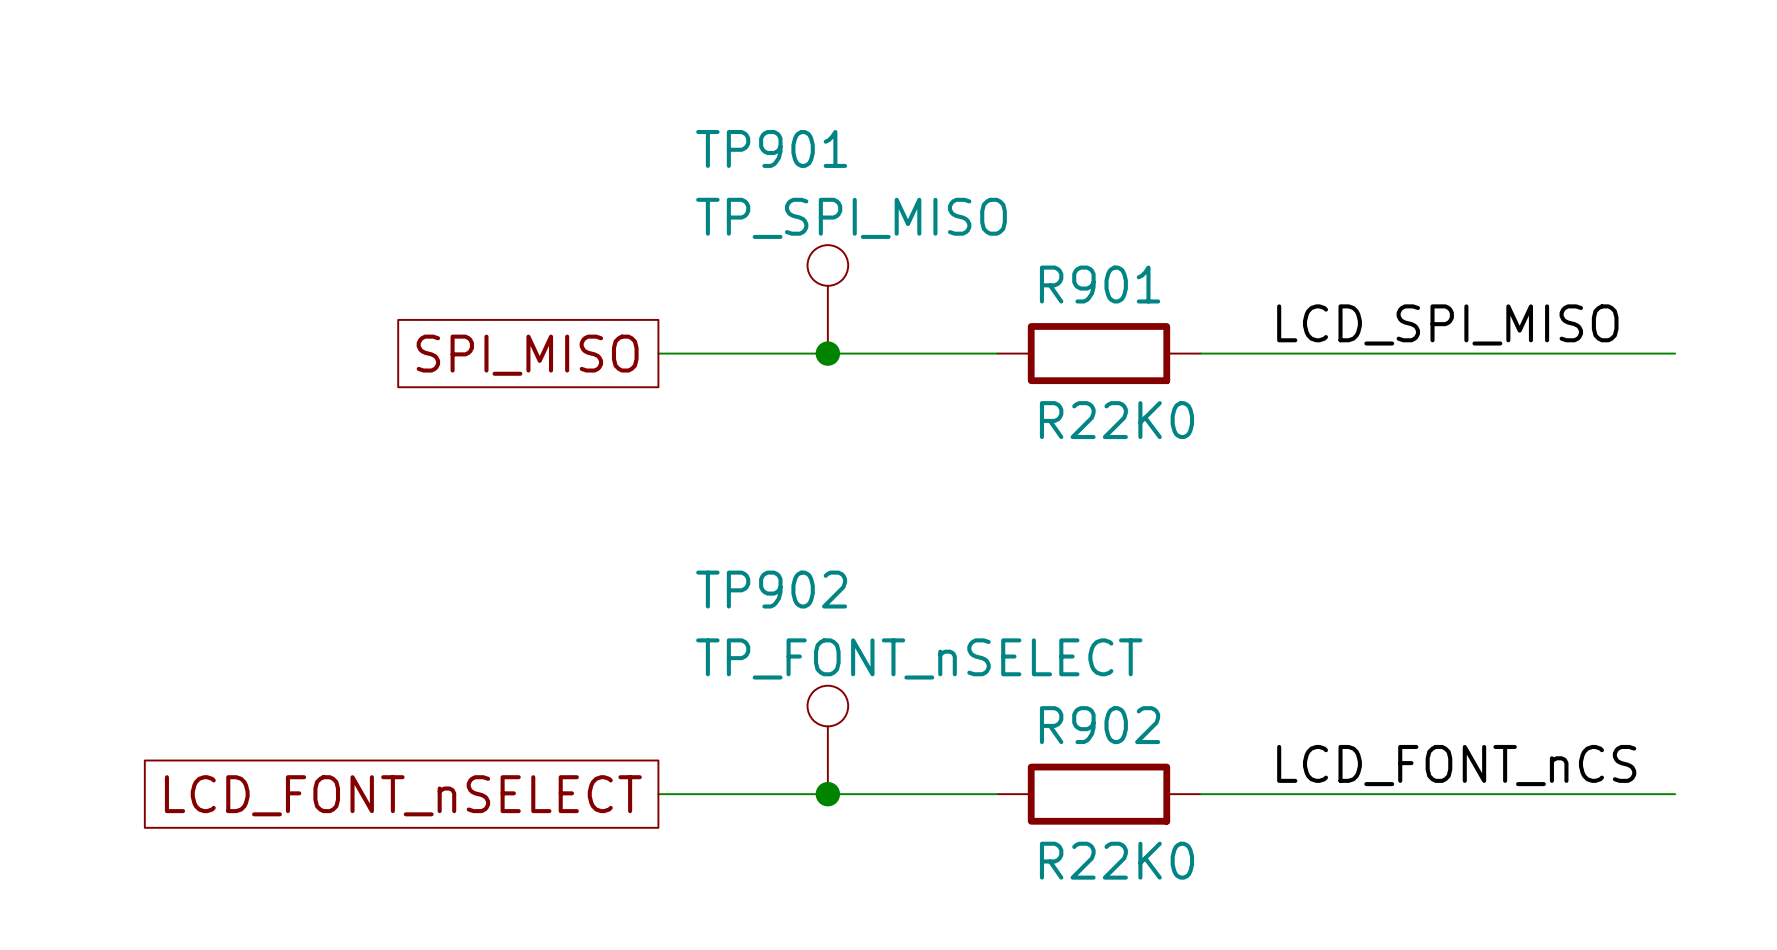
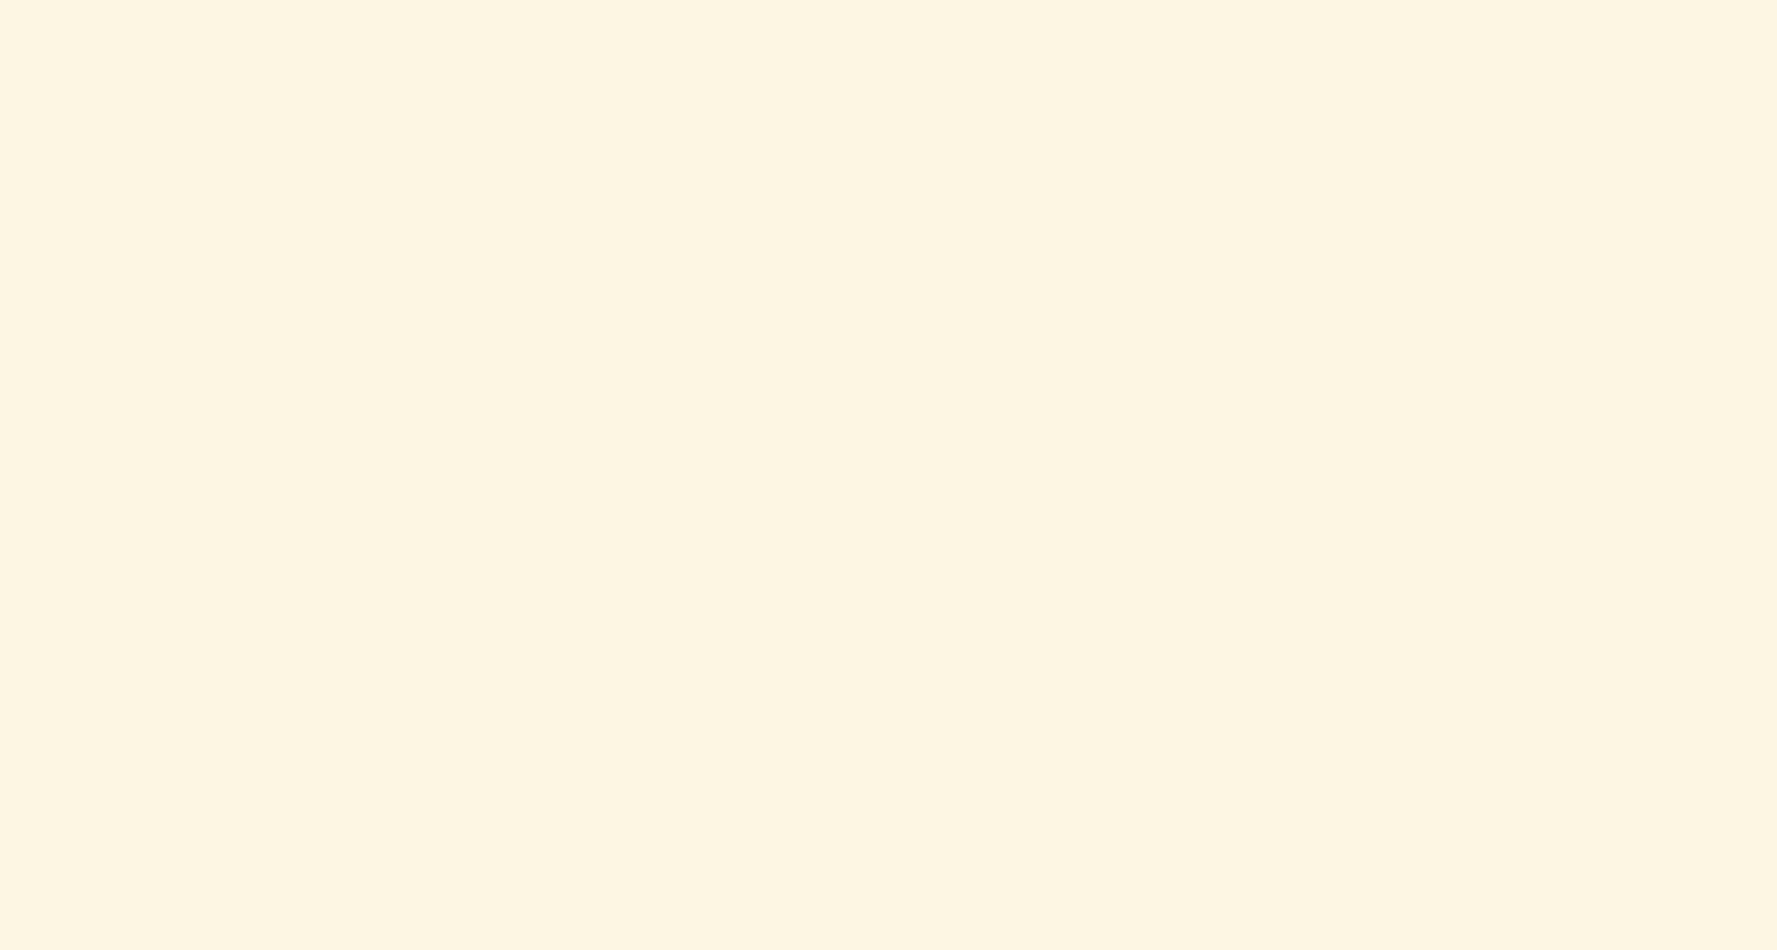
TP901: TP_SPI_MISO (827, 299) -> none
label: LCD_SPI_MISO (1447, 324) -> none
wire: (658, 353) (997, 353) -> none
junction: (827, 353) -> none
R901: R22K0 (1098, 353) -> none
wire: (1200, 353) (1675, 353) -> none
global label: SPI_MISO (527, 355) -> none
TP902: TP_FONT_nSELECT (827, 739) -> none
label: LCD_FONT_nCS (1456, 765) -> none
wire: (658, 794) (997, 794) -> none
junction: (827, 794) -> none
R902: R22K0 (1098, 794) -> none
wire: (1200, 794) (1675, 794) -> none
global label: LCD_FONT_nSELECT (403, 795) -> none

